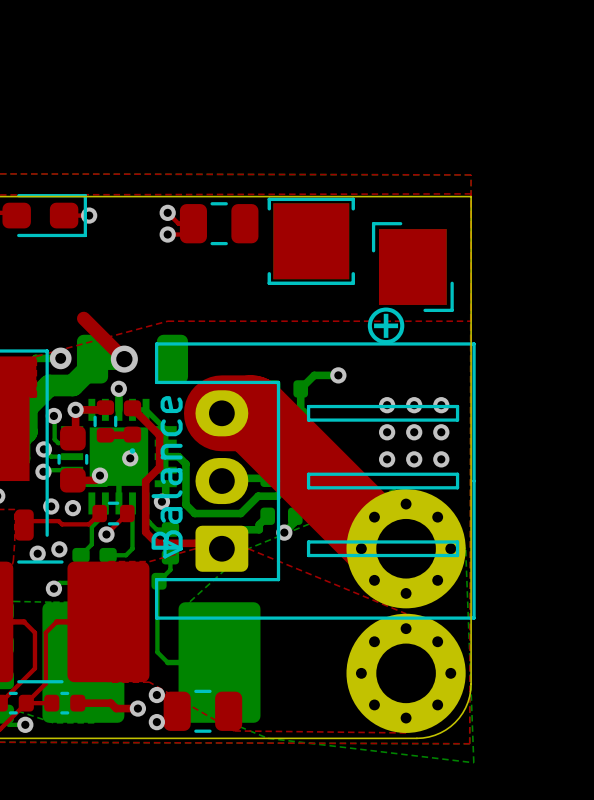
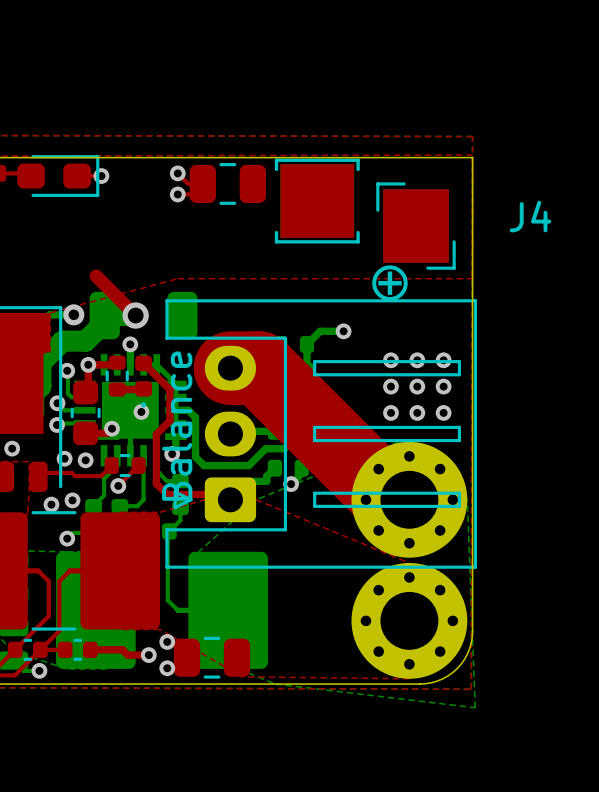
J4 name: none -> J4 (530, 216)

